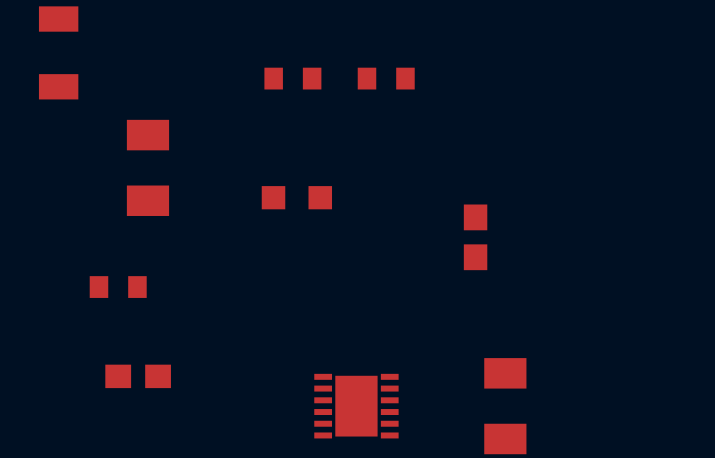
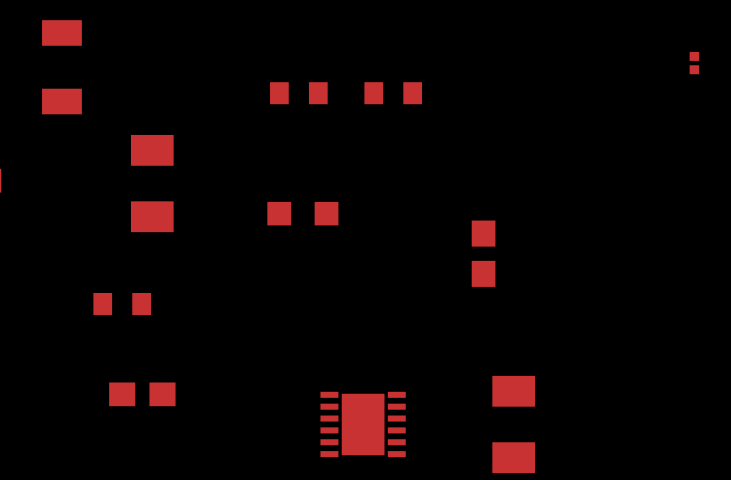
part: none -> (694, 63)

